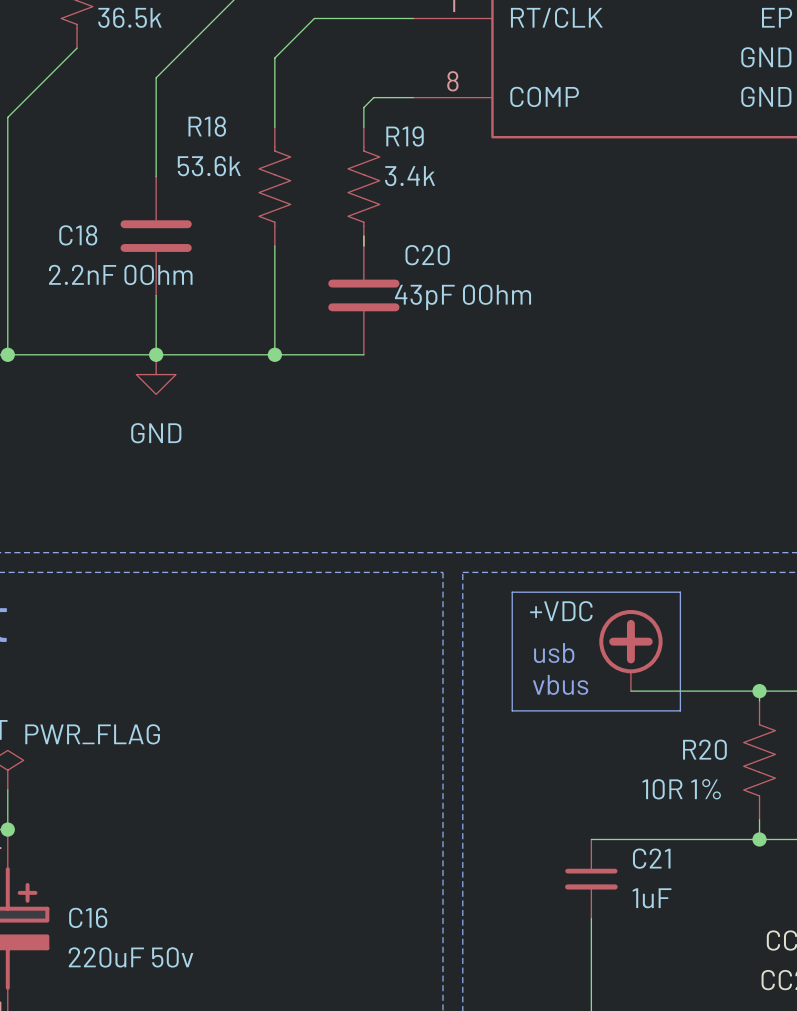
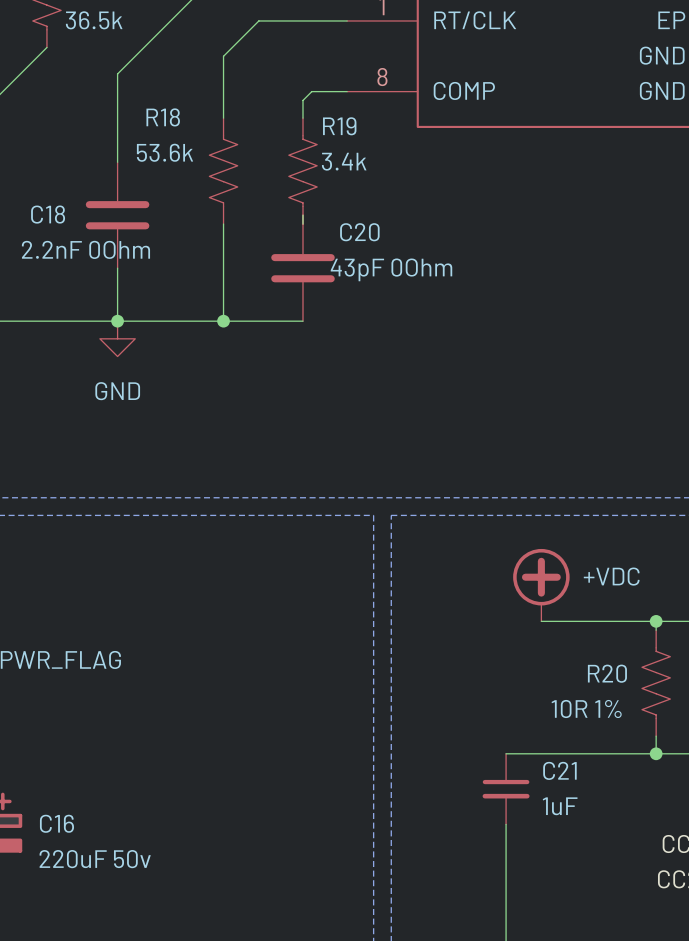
line: (512, 592) (680, 592) (680, 710) (512, 710) (512, 592) -> none
power symbol text position: +VDC (561, 611) -> +VDC (611, 576)
text: usb (554, 653) -> none
text: vbus (560, 684) -> none

